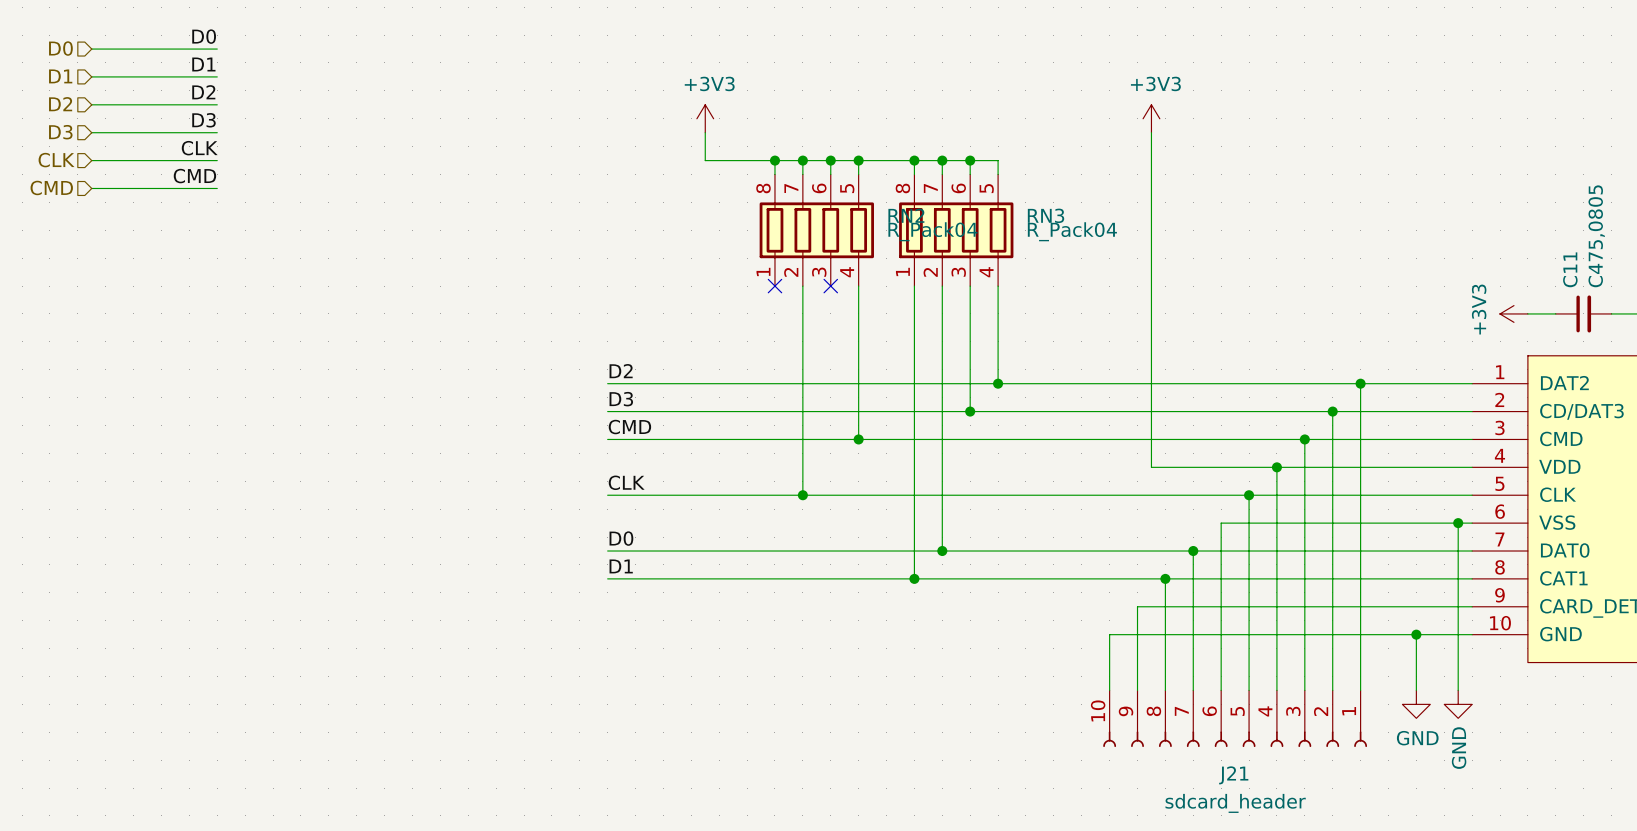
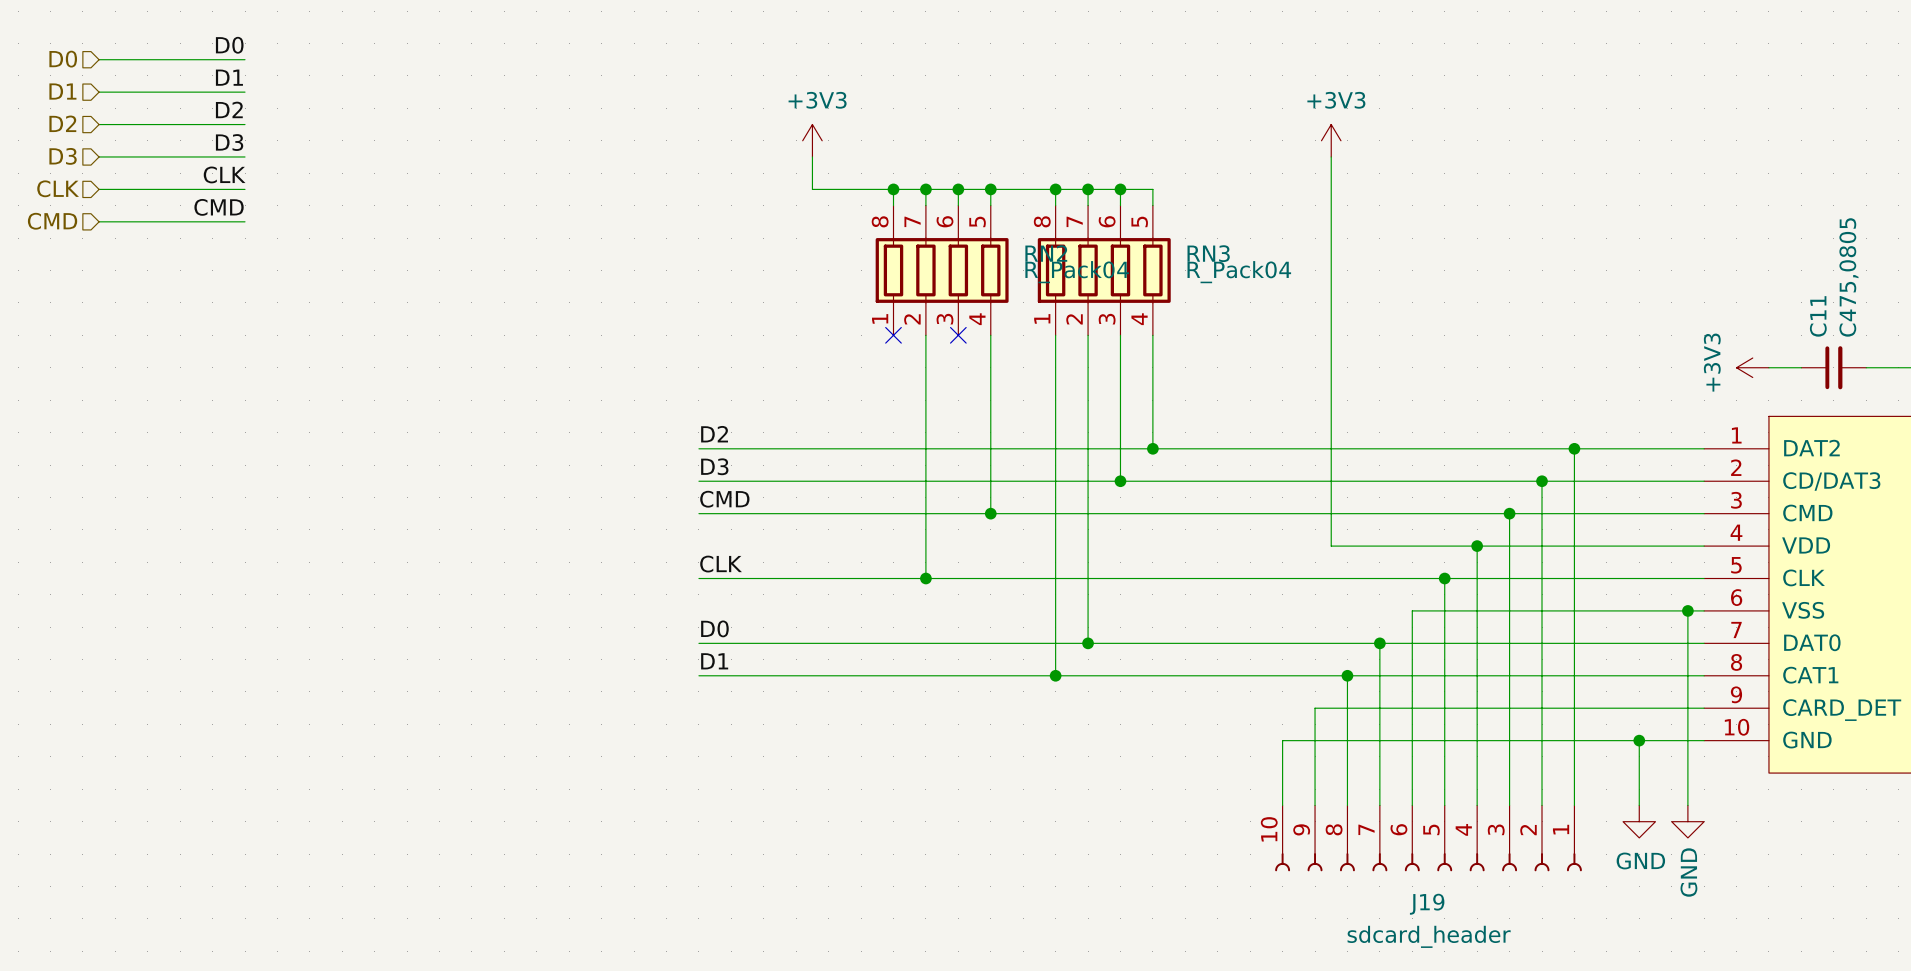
J21 name: J21 (1233, 775) -> J19 (1427, 904)

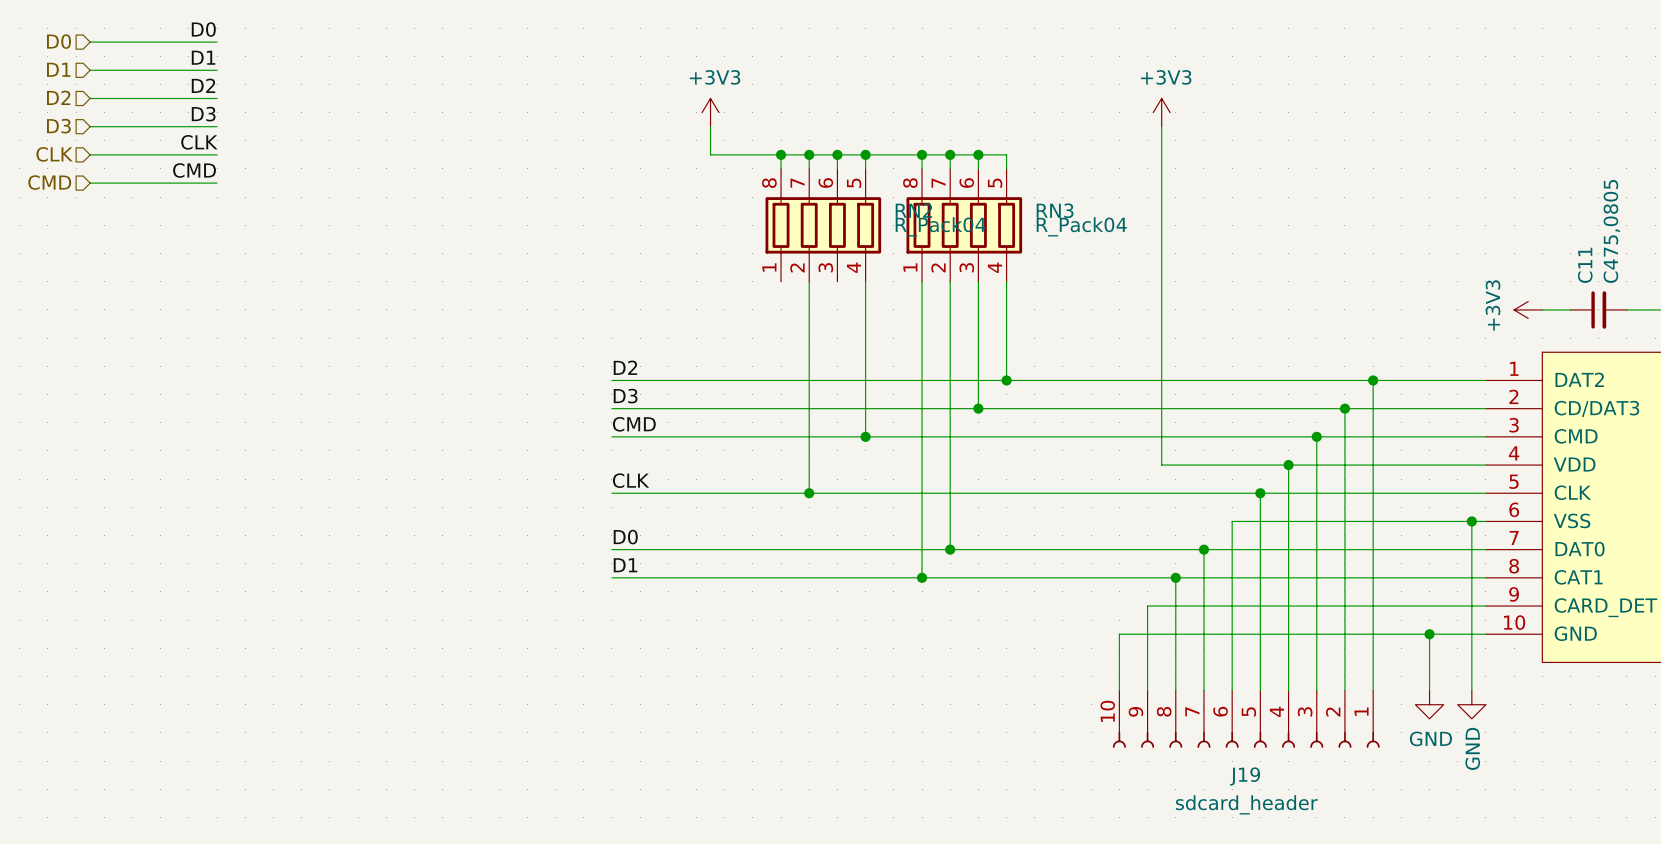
no-connect mark: (893, 335) -> none
no-connect mark: (958, 335) -> none

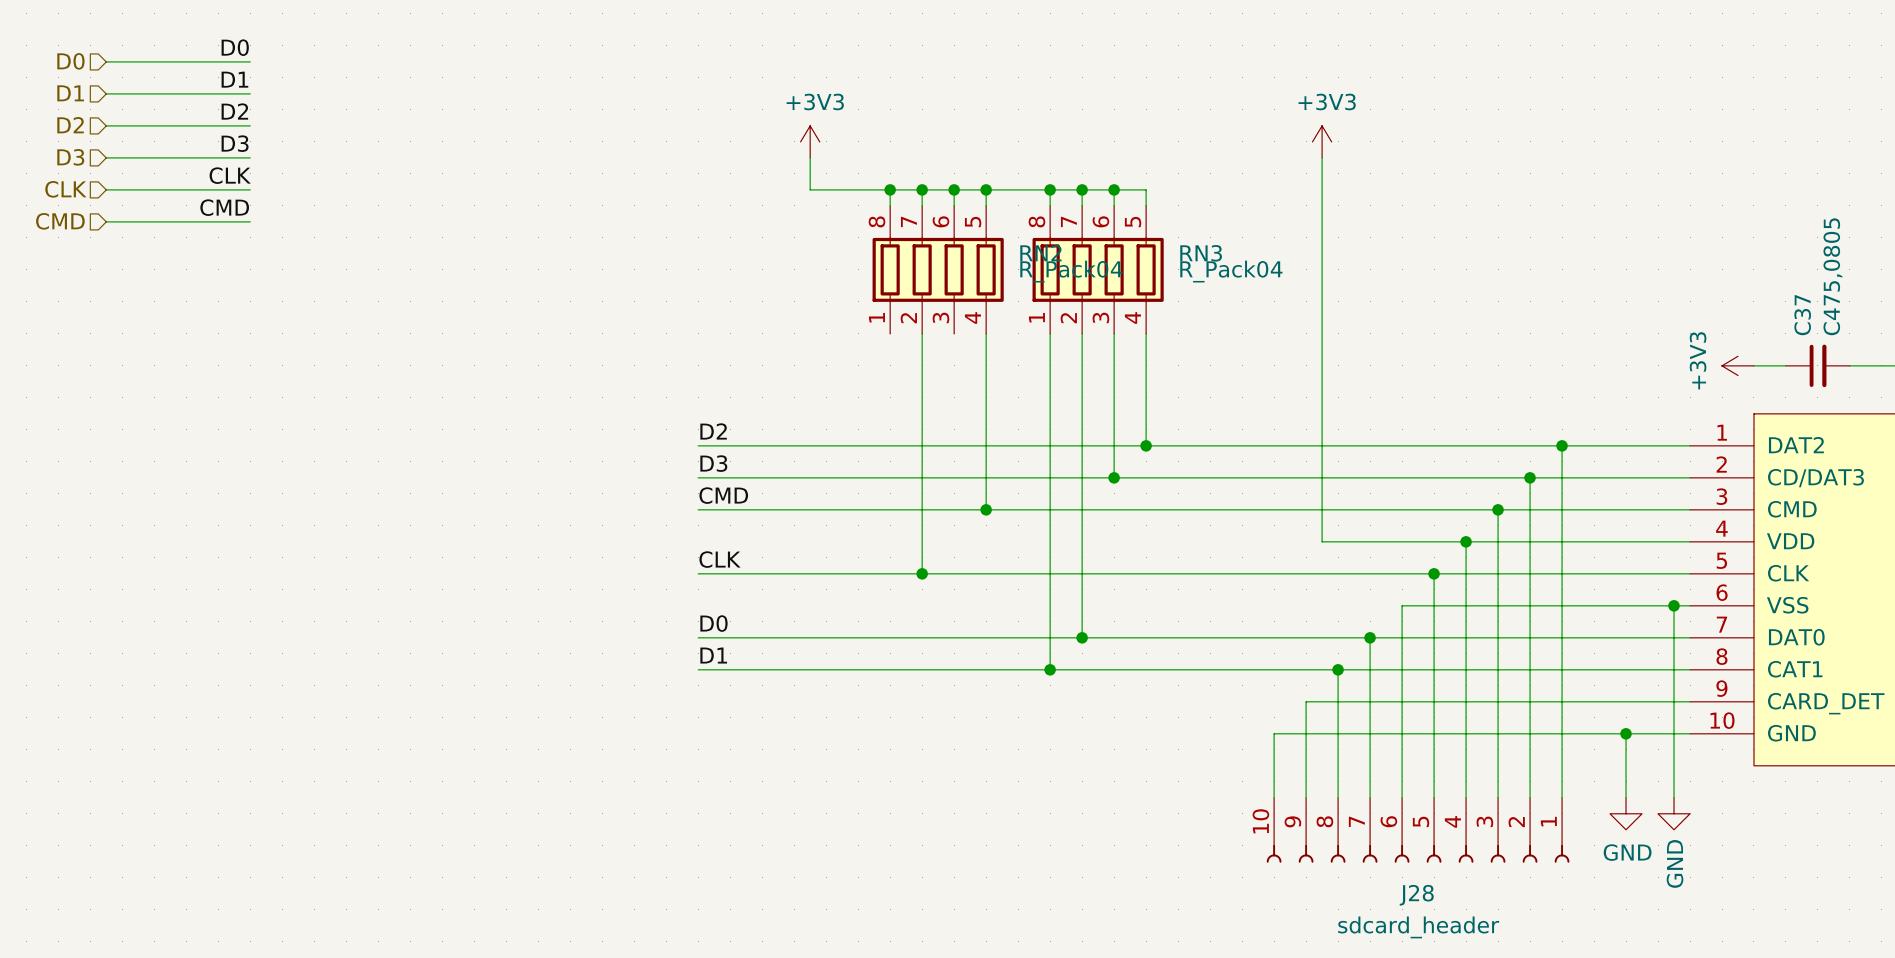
C11 name: C11 (1585, 265) -> C37 (1802, 315)
J19 name: J19 (1245, 776) -> J28 (1416, 895)

